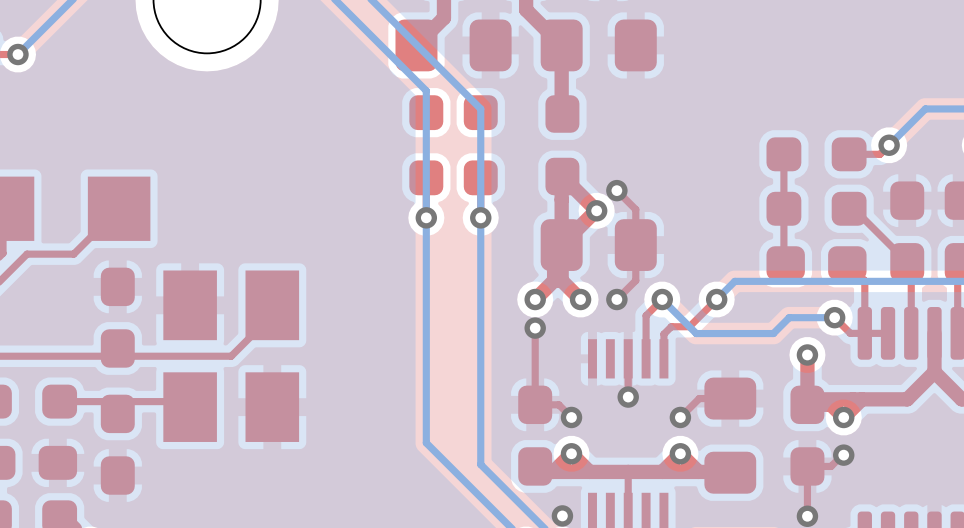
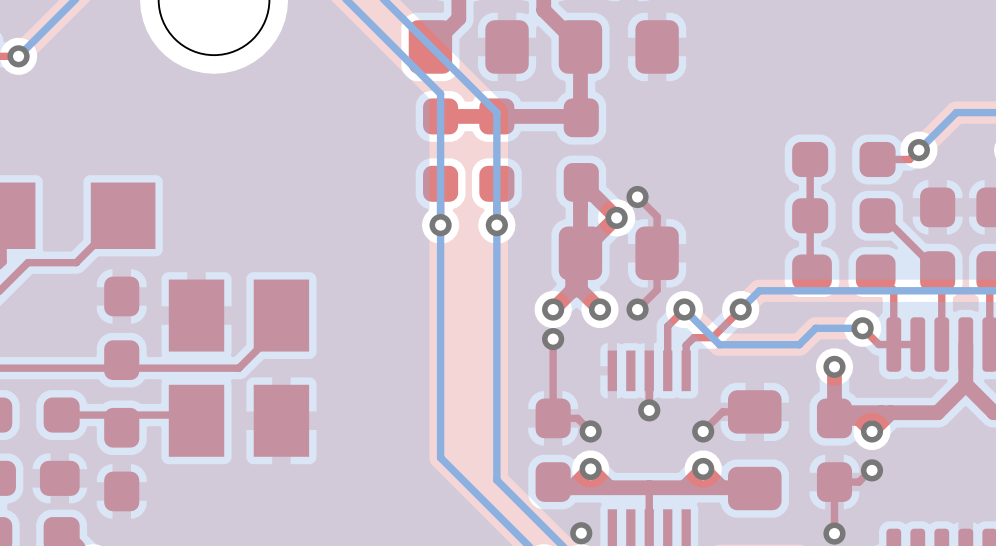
top track: none -> (440, 116) (580, 117)

